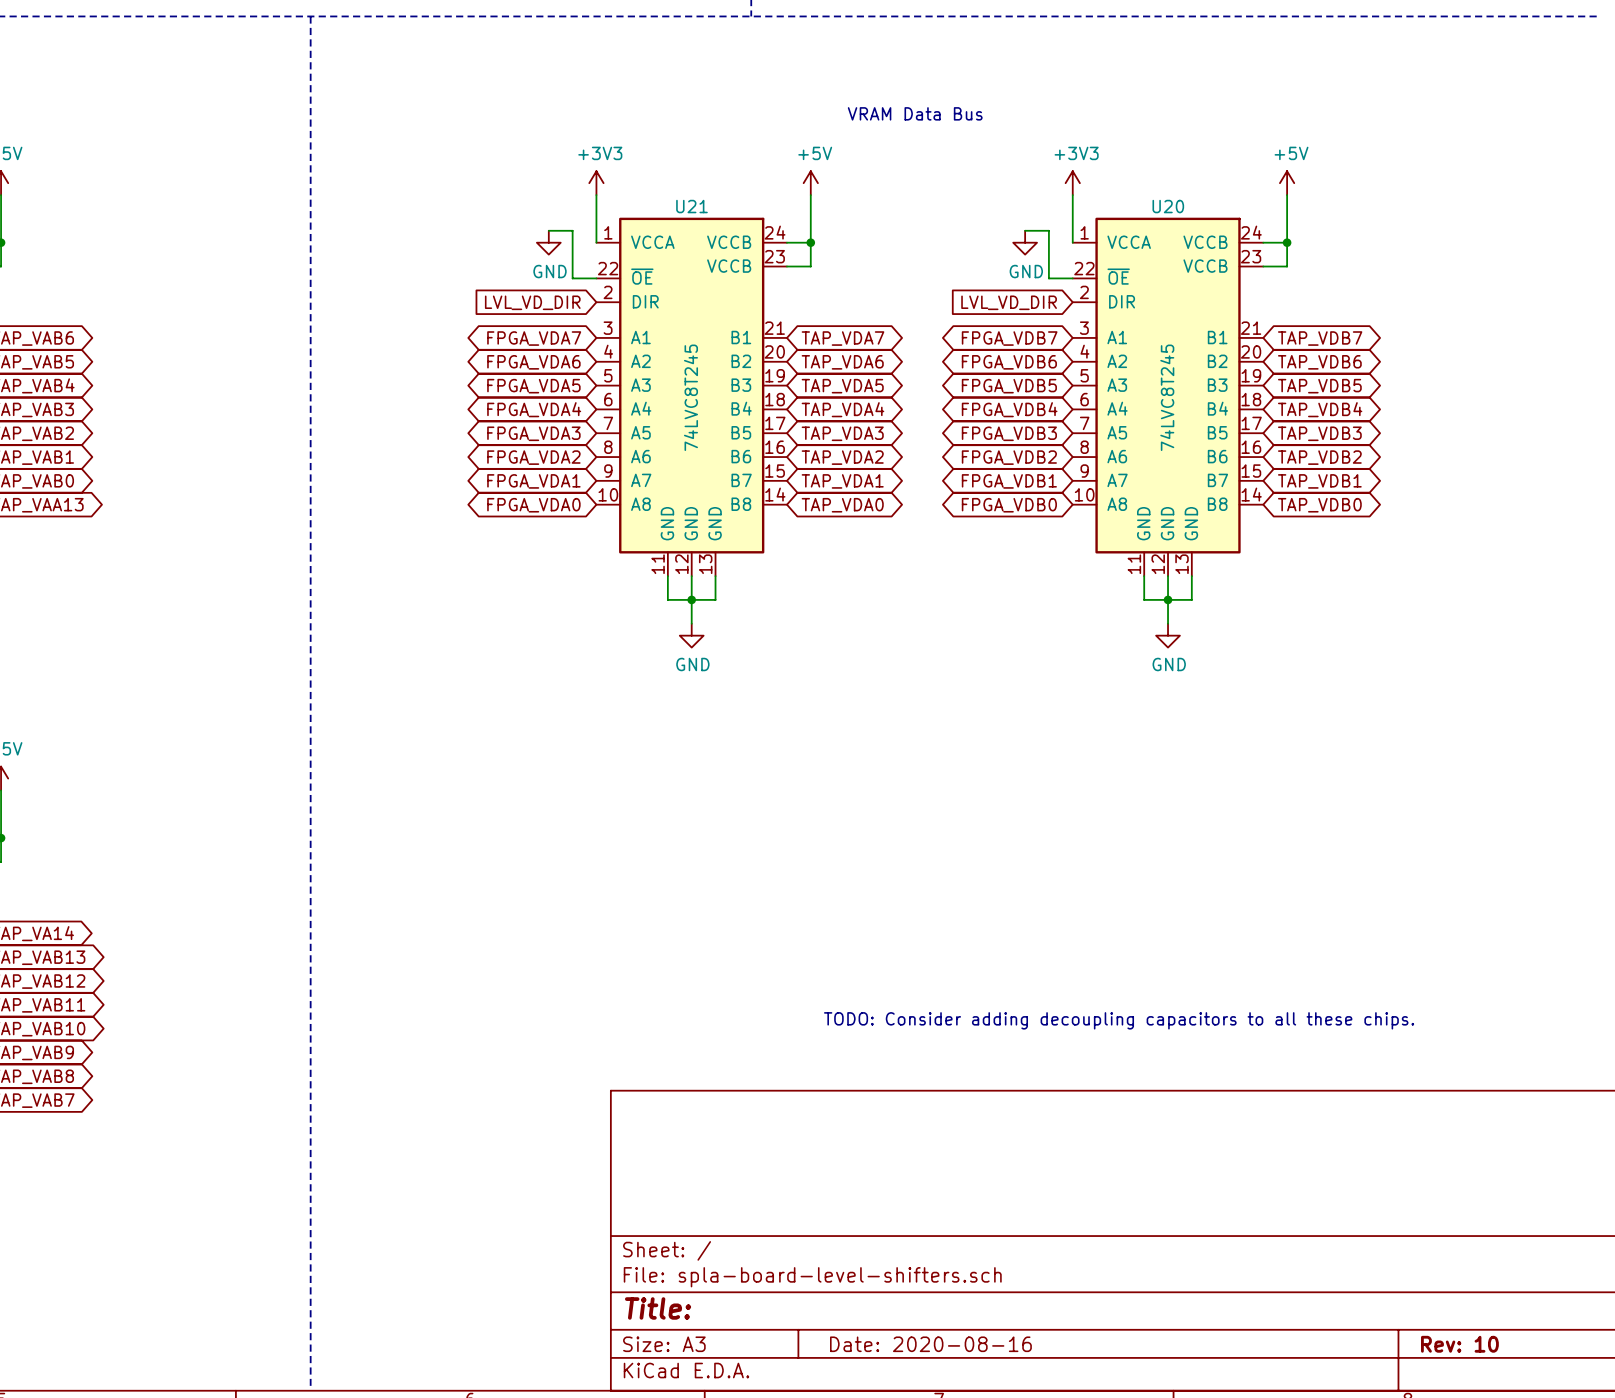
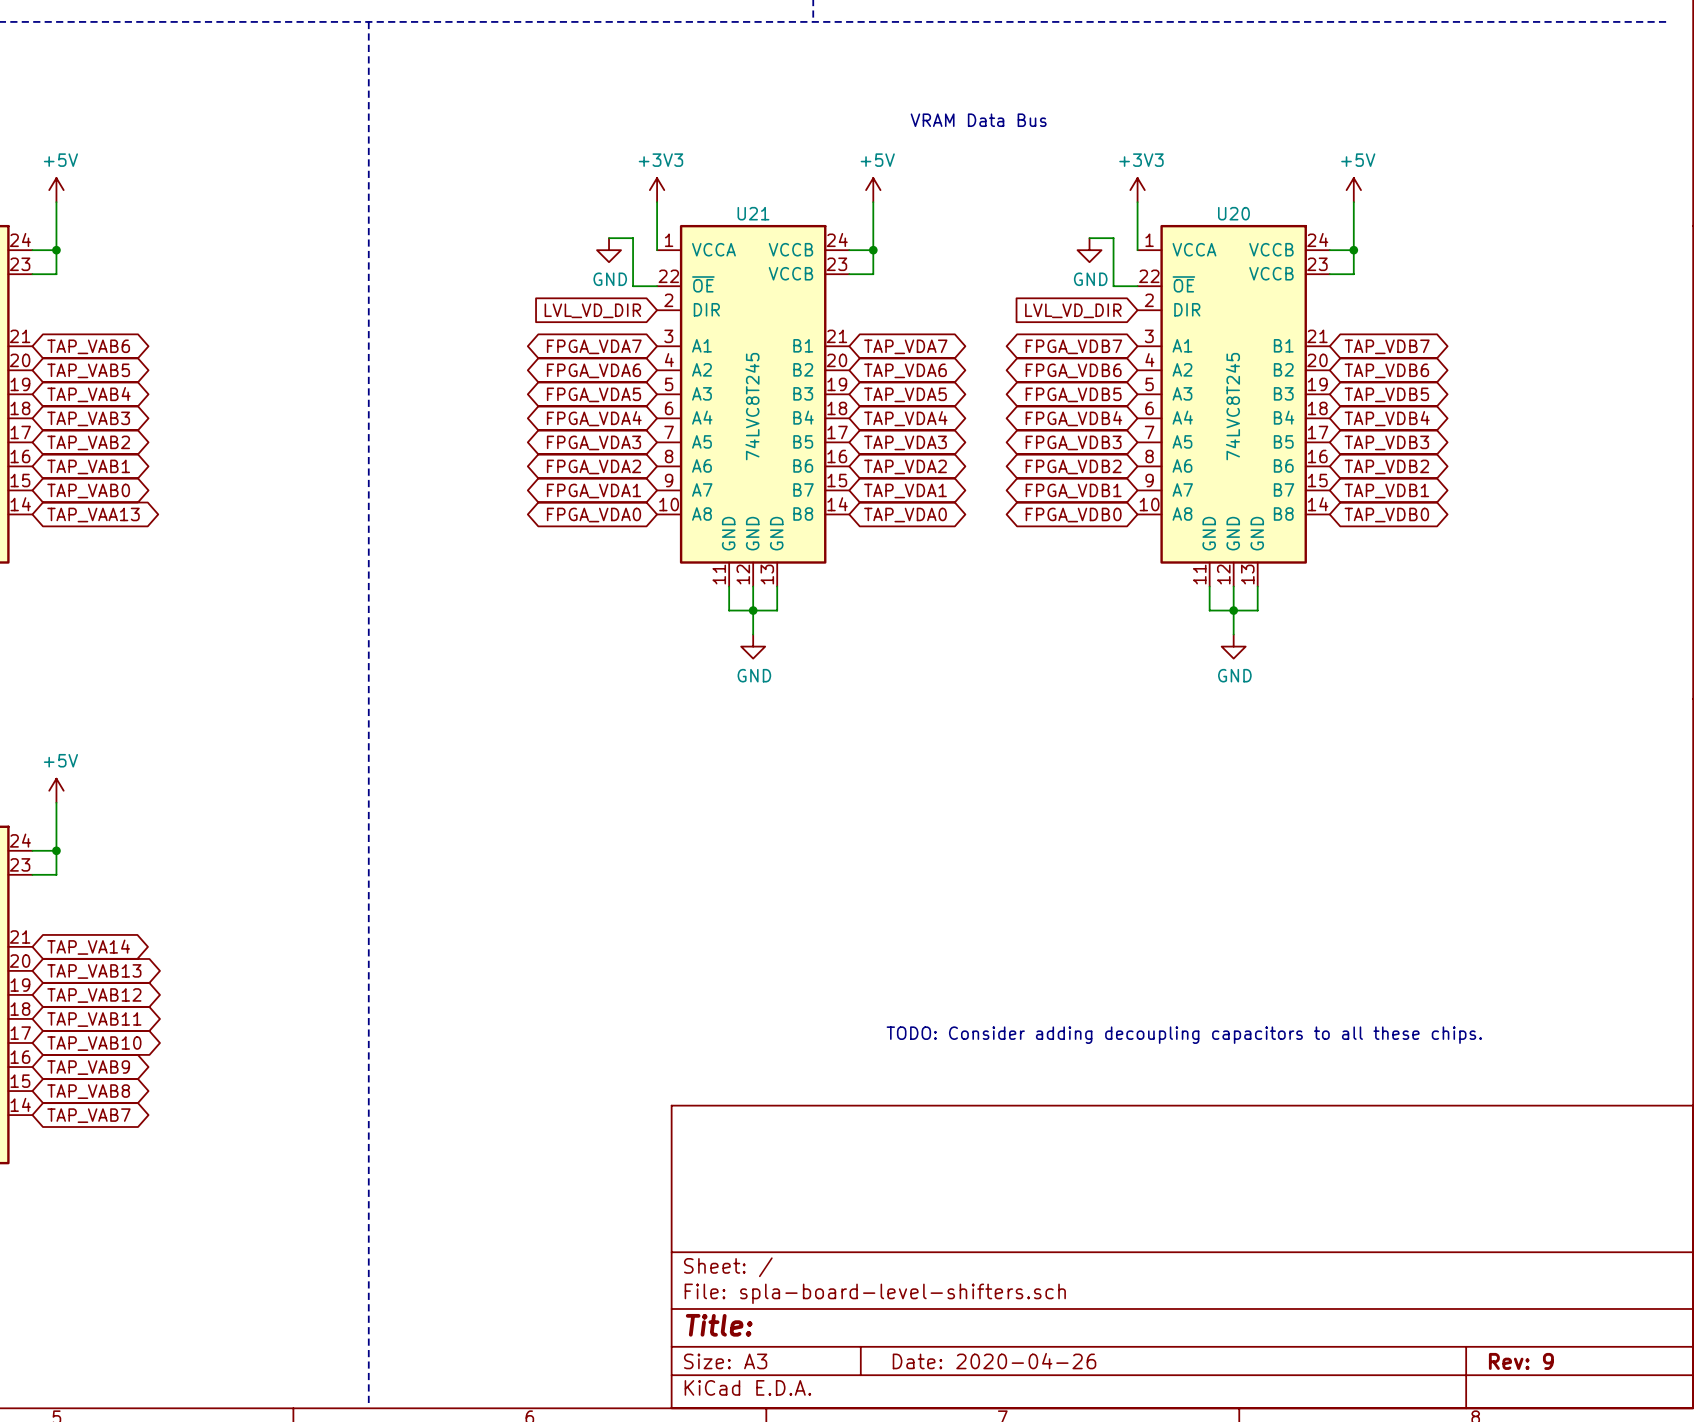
title block: Date: 2020-08-16 (930, 1344) -> Date: 2020-04-26 (994, 1361)
title block: Rev: 10 (1459, 1344) -> Rev: 9 (1521, 1361)

